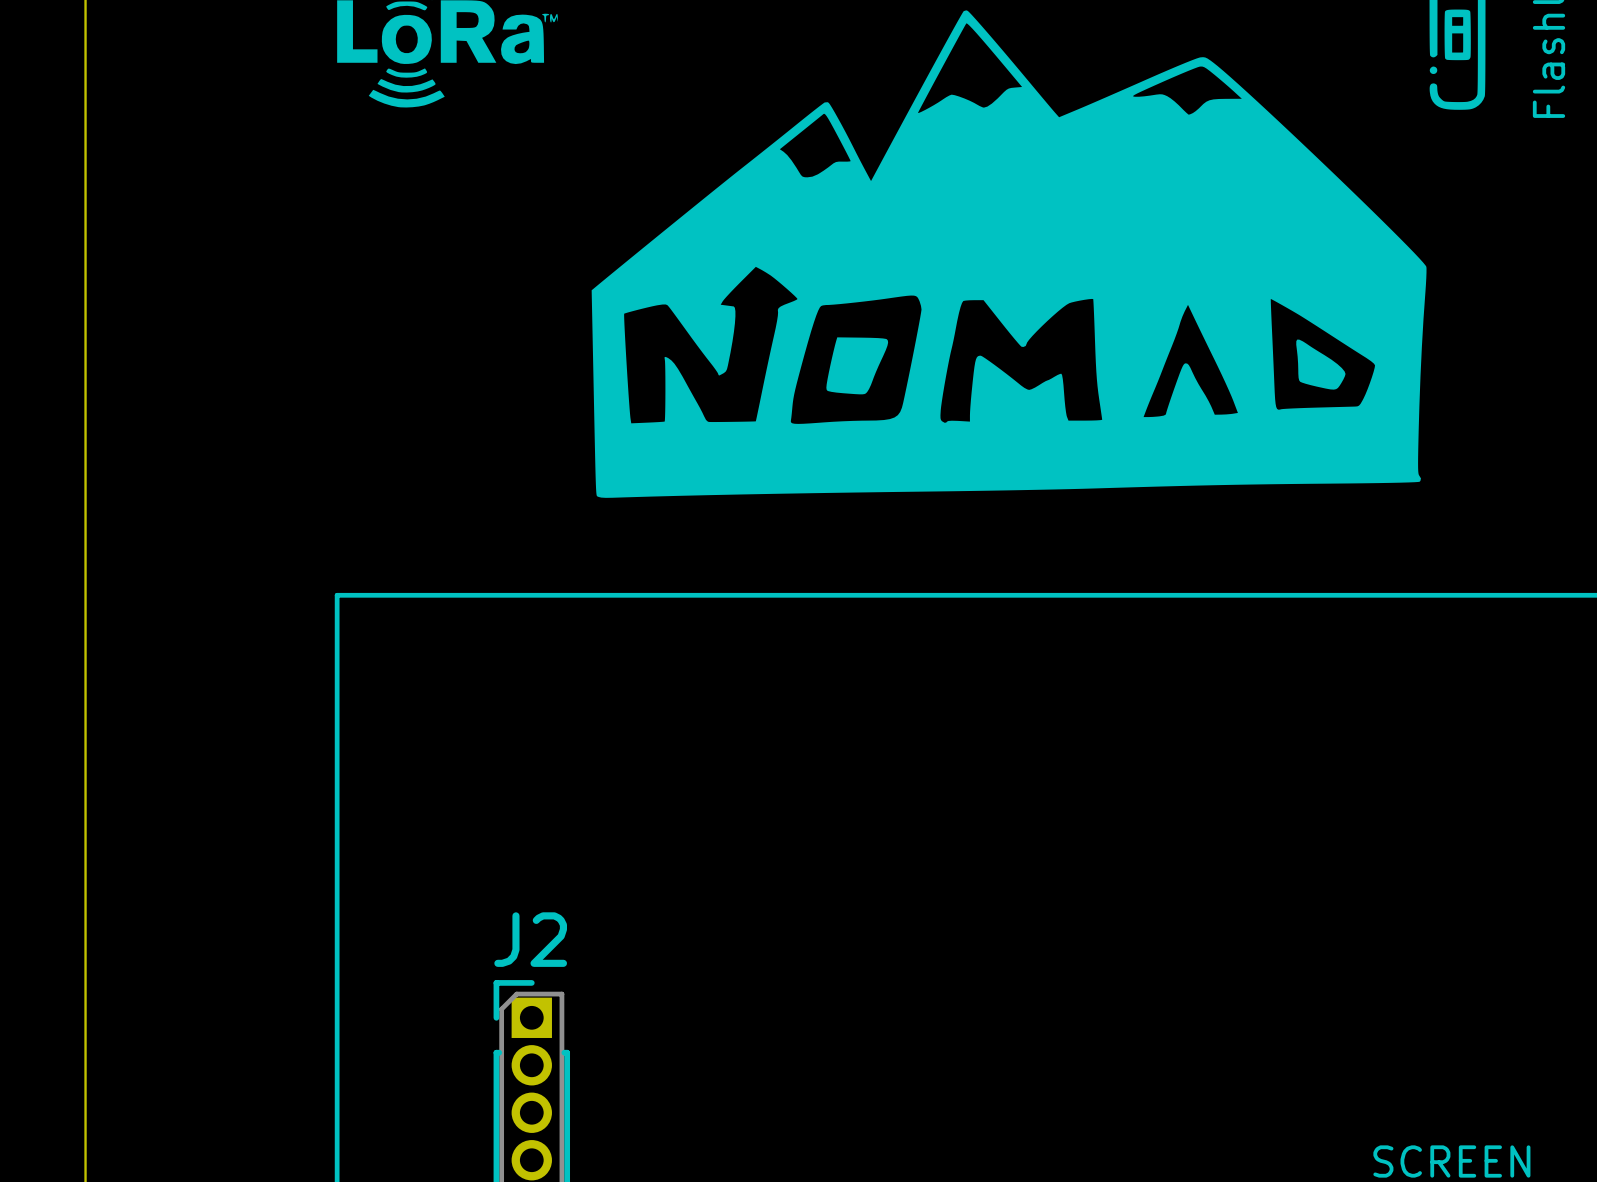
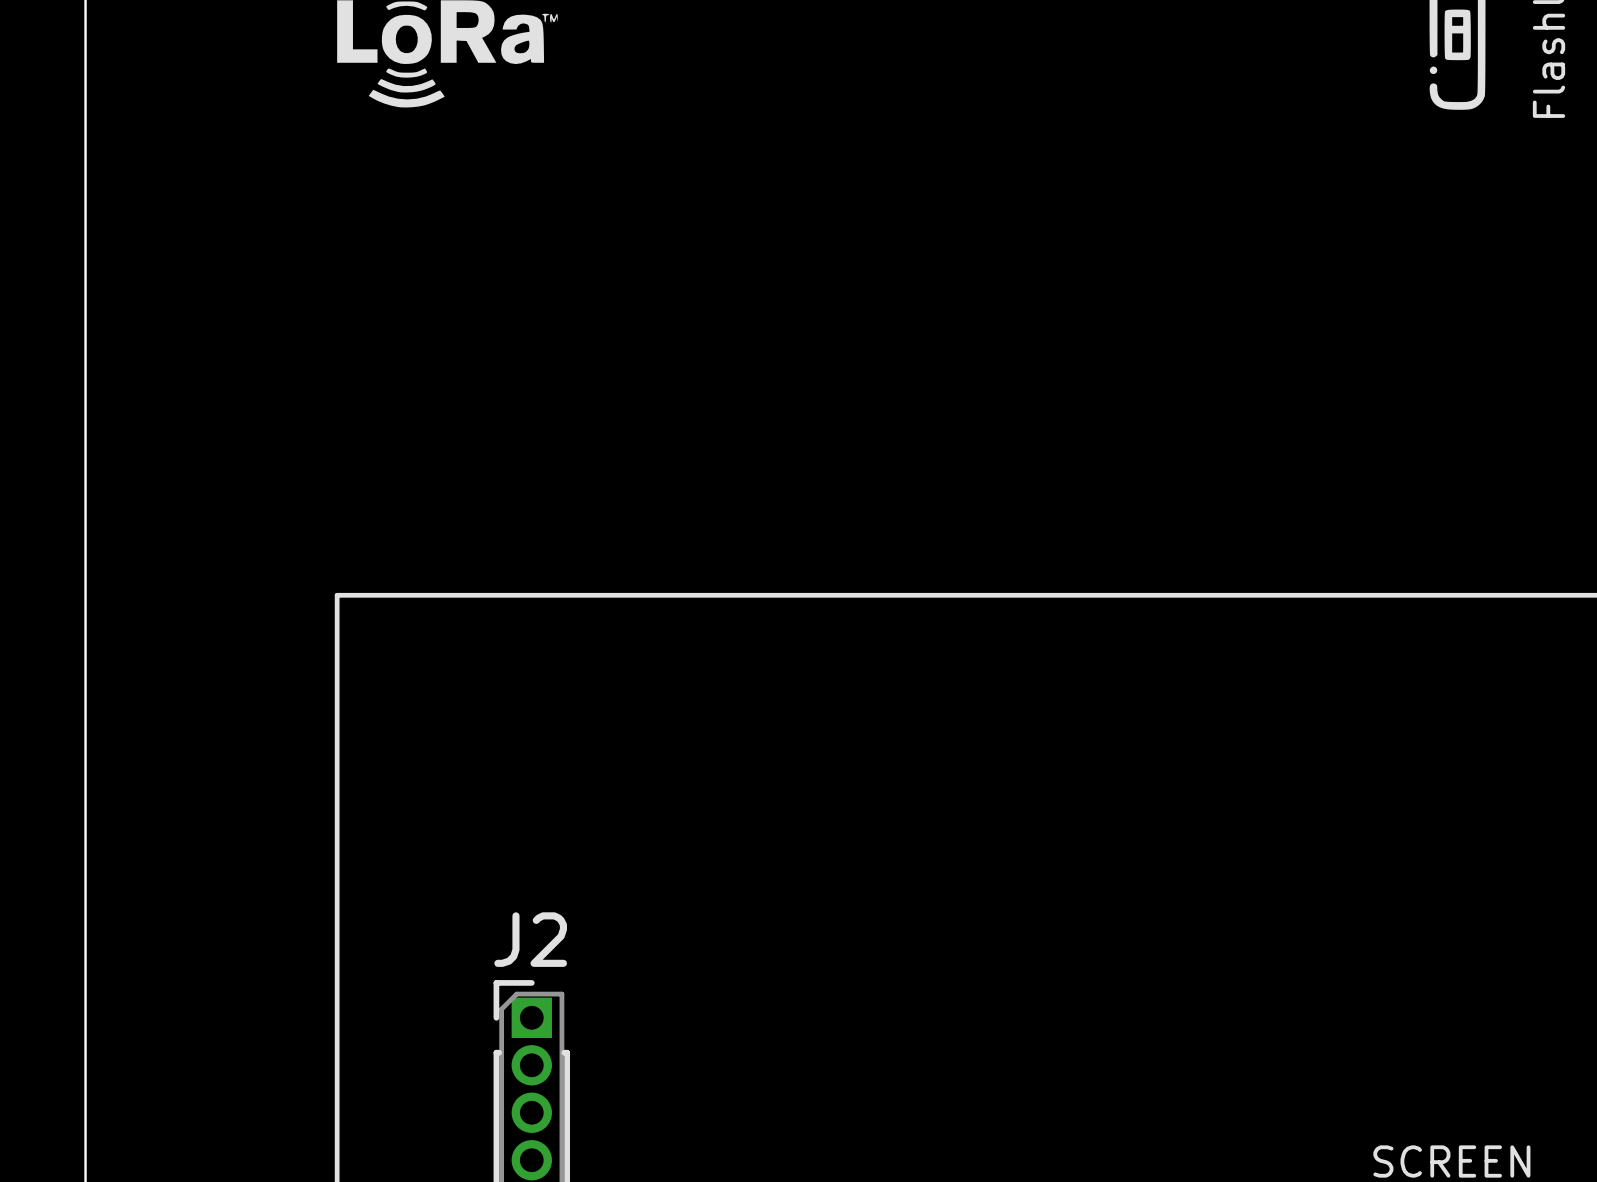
drawing: [591, 10, 1427, 498] -> none

